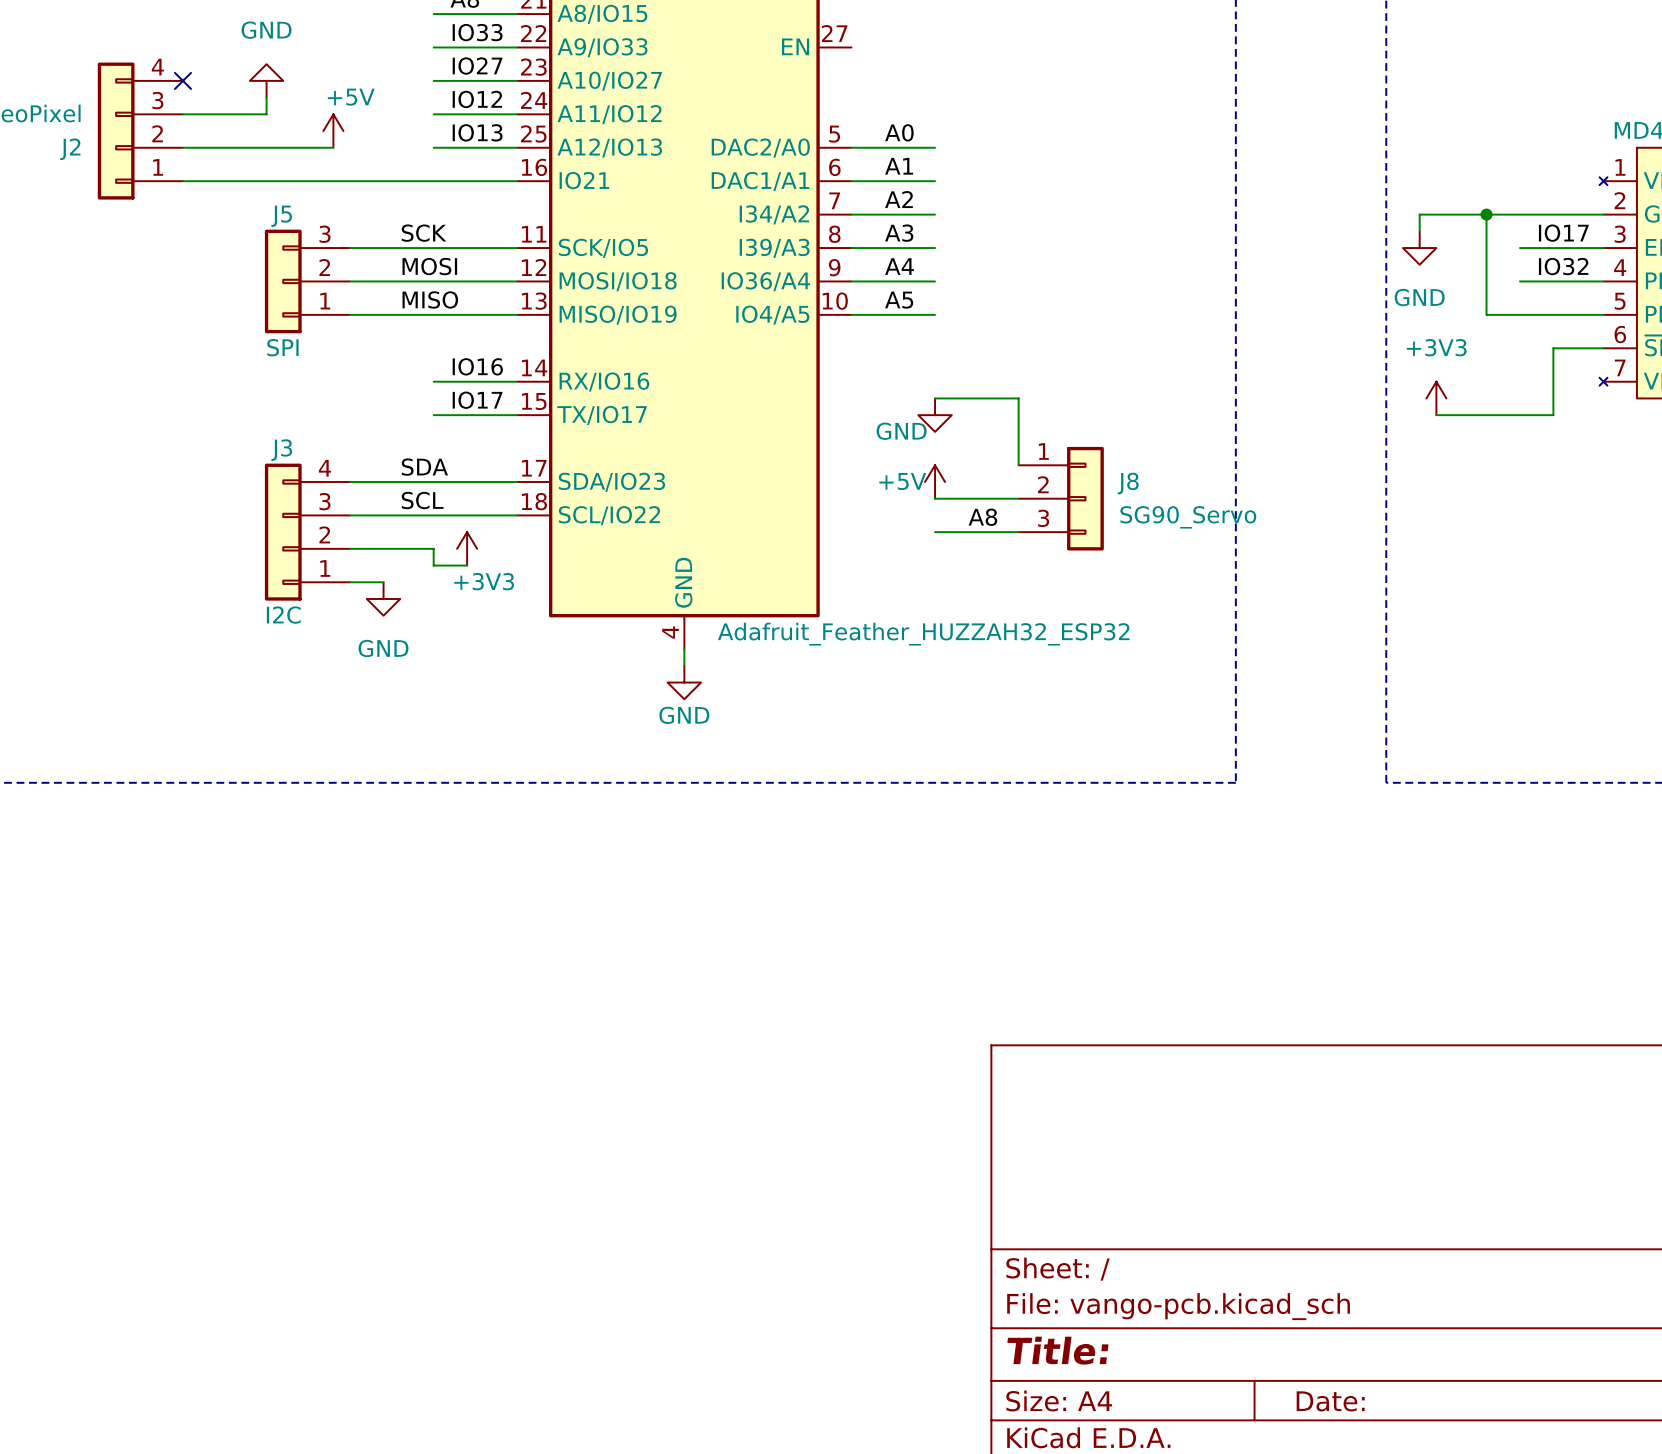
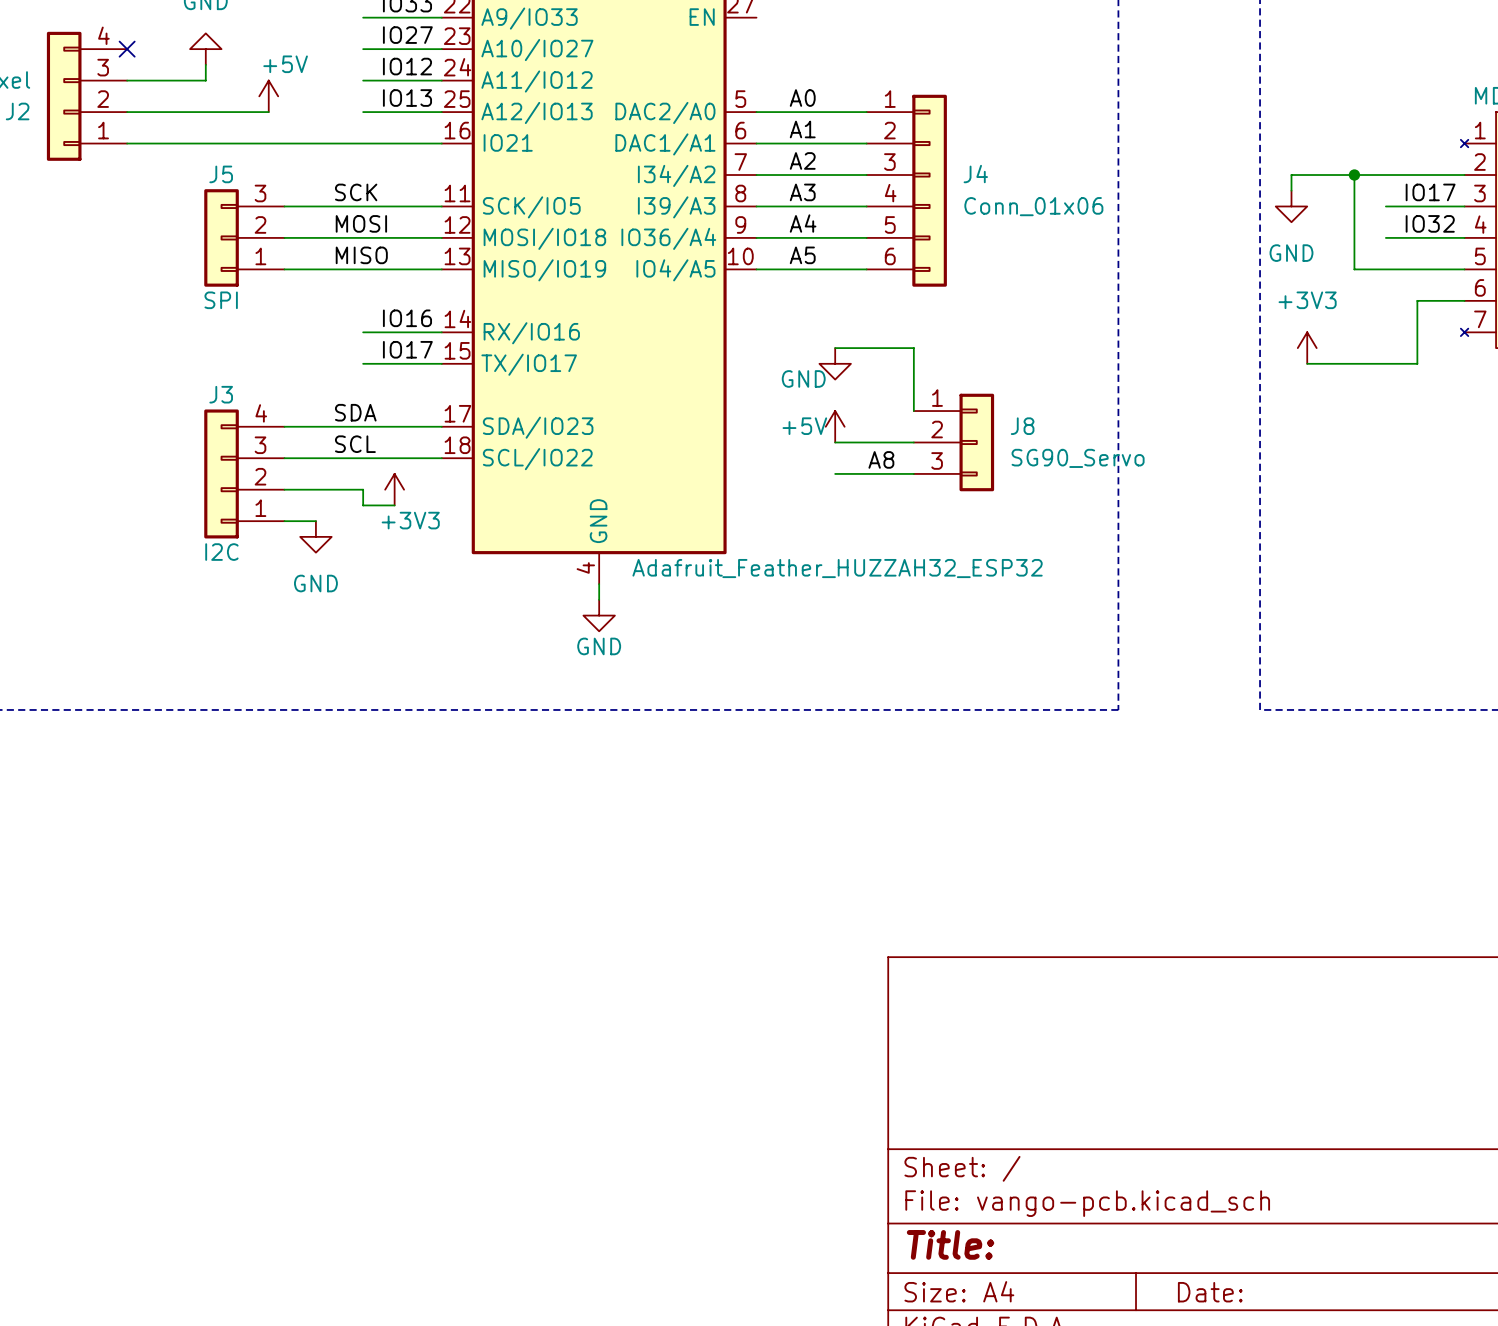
wire: none -> (835, 112) (866, 112)
wire: none -> (835, 143) (866, 143)
wire: none -> (835, 175) (866, 175)
J4: none -> Conn_01x06 (906, 190)
wire: none -> (835, 206) (866, 206)
wire: none -> (835, 237) (866, 237)
wire: none -> (835, 269) (866, 269)

